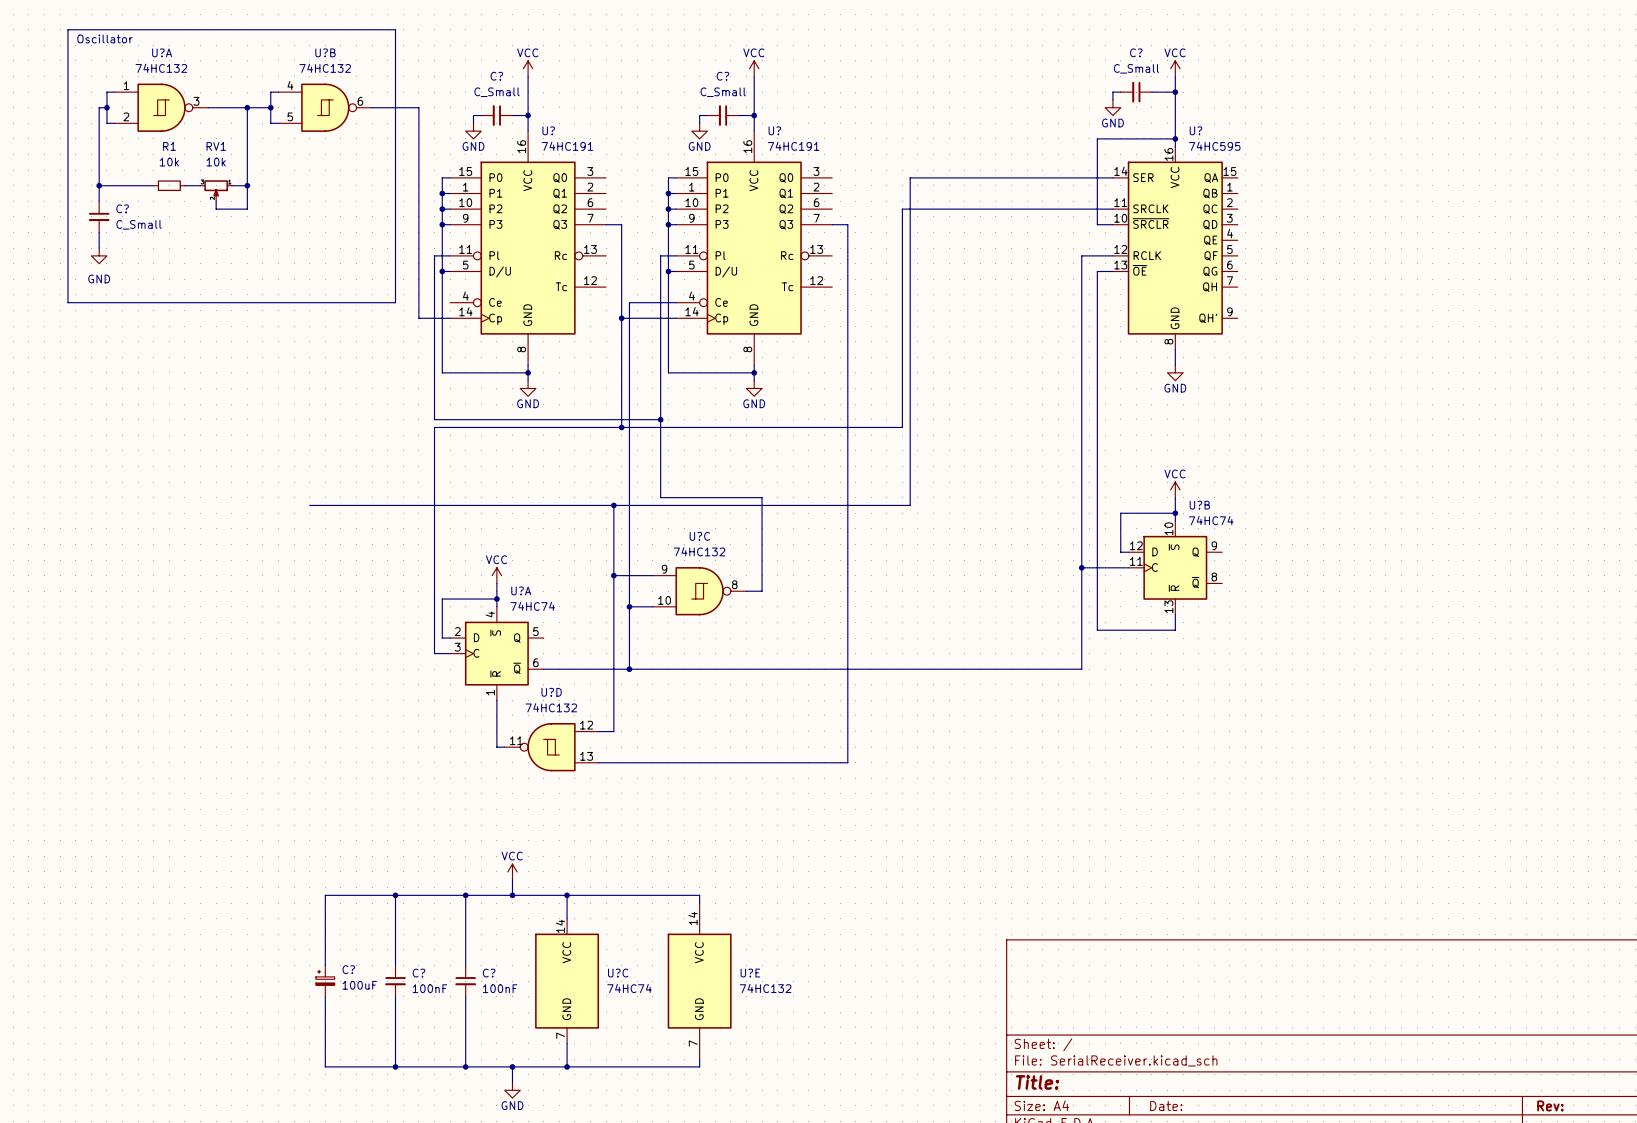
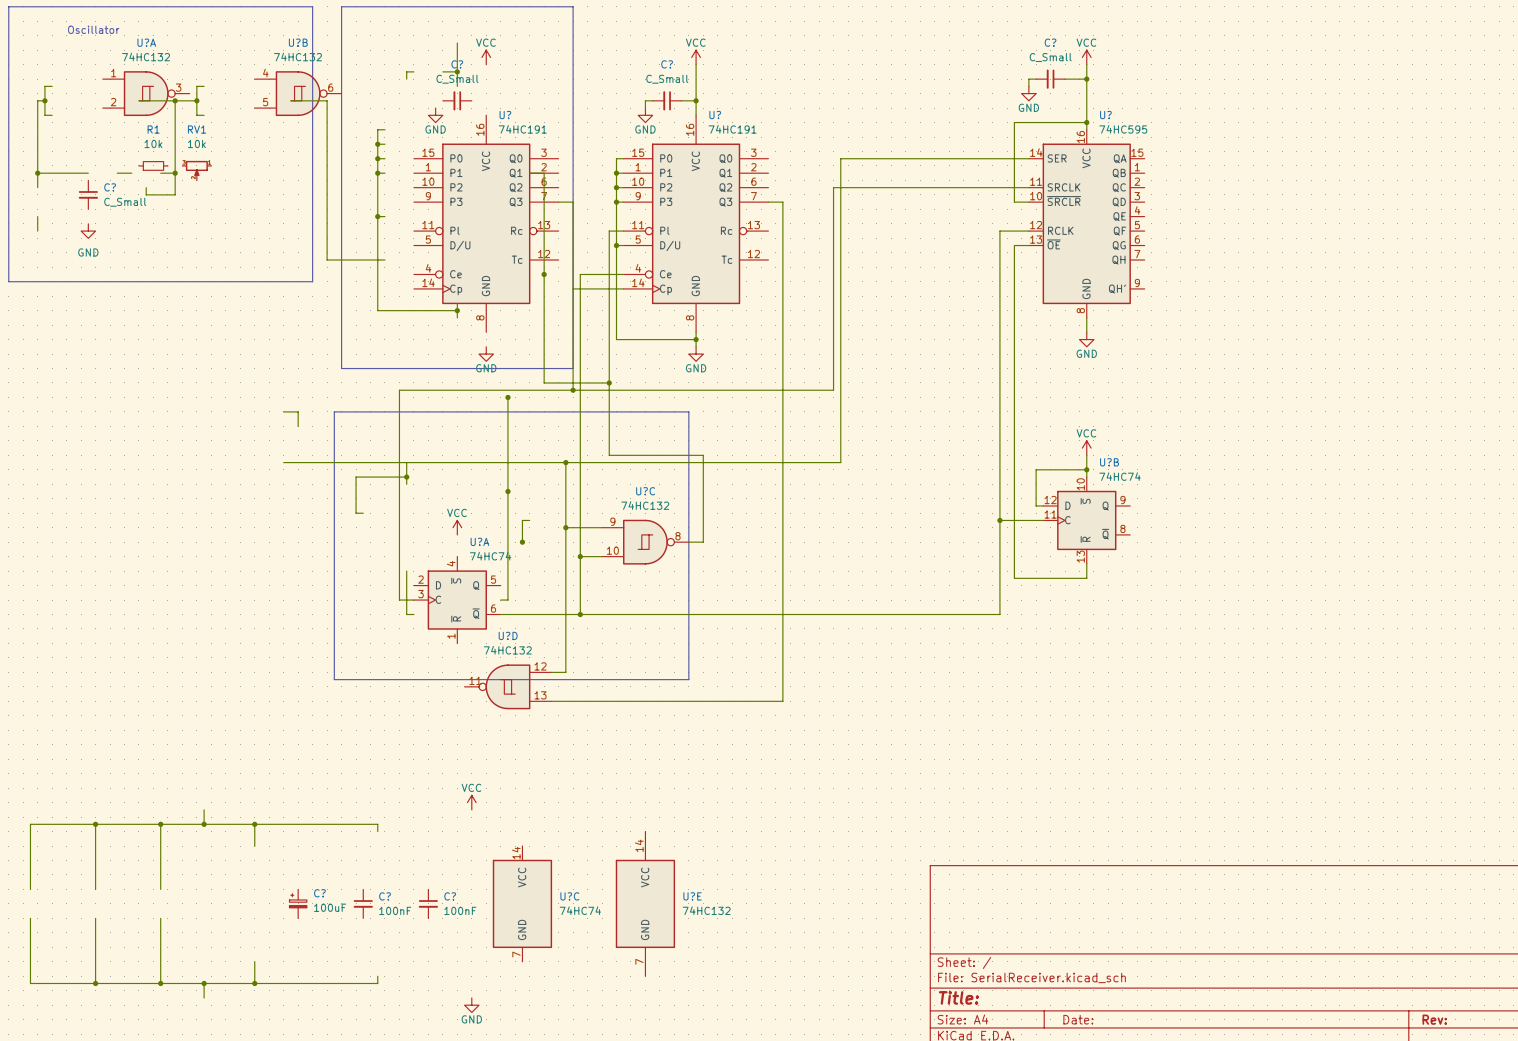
line: none -> (341, 6) (341, 368) (573, 368) (573, 6) (341, 6)
line: (67, 29) (67, 302) (395, 302) (395, 29) (67, 29) -> (8, 6) (8, 281) (312, 281) (312, 6) (8, 6)
wire: none -> (457, 42) (457, 86)
wire: (528, 76) (528, 131) -> none
junction: none -> (457, 71)
wire: (114, 92) (106, 92) (106, 123) (114, 123) -> (52, 86) (44, 86) (44, 115) (52, 115)
wire: (278, 92) (270, 92) (270, 123) (278, 123) -> (204, 86) (196, 86) (196, 115) (204, 115)
wire: (106, 107) (99, 107) (99, 201) -> (44, 100) (37, 100) (37, 187)
junction: (106, 107) -> none
wire: (208, 107) (270, 107) -> (138, 100) (196, 100)
wire: (247, 107) (247, 209) (216, 209) (216, 201) -> (175, 100) (175, 194) (146, 194) (146, 187)
junction: (247, 107) -> none
junction: (270, 107) -> none
wire: (372, 107) (418, 107) (418, 318) (450, 318) -> none
junction: none -> (44, 100)
junction: none -> (175, 100)
junction: none -> (196, 100)
wire: none -> (290, 100) (327, 100) (327, 260) (384, 260)
wire: (481, 115) (473, 115) (473, 123) -> (413, 71) (406, 71) (406, 79)
wire: (512, 115) (528, 115) -> (442, 71) (457, 71)
junction: (528, 115) -> none
junction: none -> (377, 144)
junction: none -> (377, 158)
wire: (450, 177) (442, 177) (442, 372) (528, 372) -> (384, 129) (377, 129) (377, 310) (457, 310)
wire: (99, 185) (153, 185) -> (37, 173) (88, 173)
junction: (99, 185) -> none
wire: (184, 185) (200, 185) -> (117, 173) (131, 173)
wire: (231, 185) (247, 185) -> (160, 173) (175, 173)
junction: (247, 185) -> none
junction: none -> (37, 173)
junction: none -> (175, 173)
junction: none -> (377, 173)
wire: (442, 193) (450, 193) -> (377, 144) (384, 144)
junction: (442, 193) -> none
wire: (442, 209) (450, 209) -> (377, 158) (384, 158)
junction: (442, 209) -> none
wire: (442, 224) (450, 224) -> (377, 173) (384, 173)
junction: (442, 224) -> none
wire: (99, 232) (99, 248) -> (37, 216) (37, 231)
junction: none -> (377, 216)
wire: (450, 255) (434, 255) (434, 419) (590, 419) -> (529, 173) (544, 173) (544, 382)
wire: (442, 271) (450, 271) -> (377, 216) (384, 216)
junction: (442, 271) -> none
junction position: (621, 318) -> (544, 274)
junction: none -> (457, 310)
wire: (528, 365) (528, 380) -> (457, 303) (457, 317)
junction: (528, 372) -> none
wire: none -> (507, 397) (507, 600) (500, 600)
junction: none -> (507, 397)
wire: none -> (283, 411) (298, 411) (298, 426)
line: none -> (334, 411) (688, 411) (688, 679) (334, 679) (334, 411)
wire: none -> (406, 477) (356, 477) (356, 513) (363, 513)
junction: none -> (406, 477)
junction: none -> (507, 491)
wire: none -> (529, 520) (522, 520) (522, 542)
wire: (496, 583) (496, 606) -> (406, 462) (406, 484)
junction: none -> (522, 542)
wire: (496, 599) (442, 599) (442, 622) -> none
junction: (496, 599) -> none
wire: (442, 638) (450, 638) -> (406, 585) (406, 614) (413, 614)
wire: (496, 700) (496, 747) (504, 747) -> none
wire: none -> (204, 809) (204, 824)
wire: (512, 879) (512, 895) -> none
wire: none -> (95, 824) (95, 889)
junction: none -> (95, 824)
wire: none -> (160, 824) (160, 889)
junction: none -> (160, 824)
junction: none -> (204, 824)
wire: none -> (254, 824) (254, 846)
junction: none -> (254, 824)
wire: (325, 895) (325, 965) -> (298, 824) (30, 824) (30, 889)
wire: (395, 895) (395, 965) -> none
junction: (395, 895) -> none
wire: (411, 895) (699, 895) (699, 903) -> (377, 824) (377, 831)
wire: (465, 895) (465, 965) -> none
junction: (465, 895) -> none
junction: (512, 895) -> none
wire: (567, 895) (567, 918) -> none
junction: (567, 895) -> none
wire: none -> (95, 918) (95, 983)
wire: none -> (160, 918) (160, 983)
wire: (325, 996) (325, 1066) -> (30, 918) (30, 983) (298, 983)
wire: (395, 996) (395, 1066) -> none
wire: (465, 996) (465, 1066) -> none
wire: none -> (254, 961) (254, 983)
wire: (567, 1043) (567, 1066) -> none
wire: (699, 1059) (699, 1066) (411, 1066) -> (377, 976) (377, 983)
junction: none -> (95, 983)
junction: none -> (160, 983)
wire: none -> (204, 983) (204, 997)
junction: none -> (204, 983)
junction: none -> (254, 983)
junction: (395, 1066) -> none
junction: (465, 1066) -> none
wire: (512, 1066) (512, 1082) -> none
junction: (512, 1066) -> none
junction: (567, 1066) -> none

